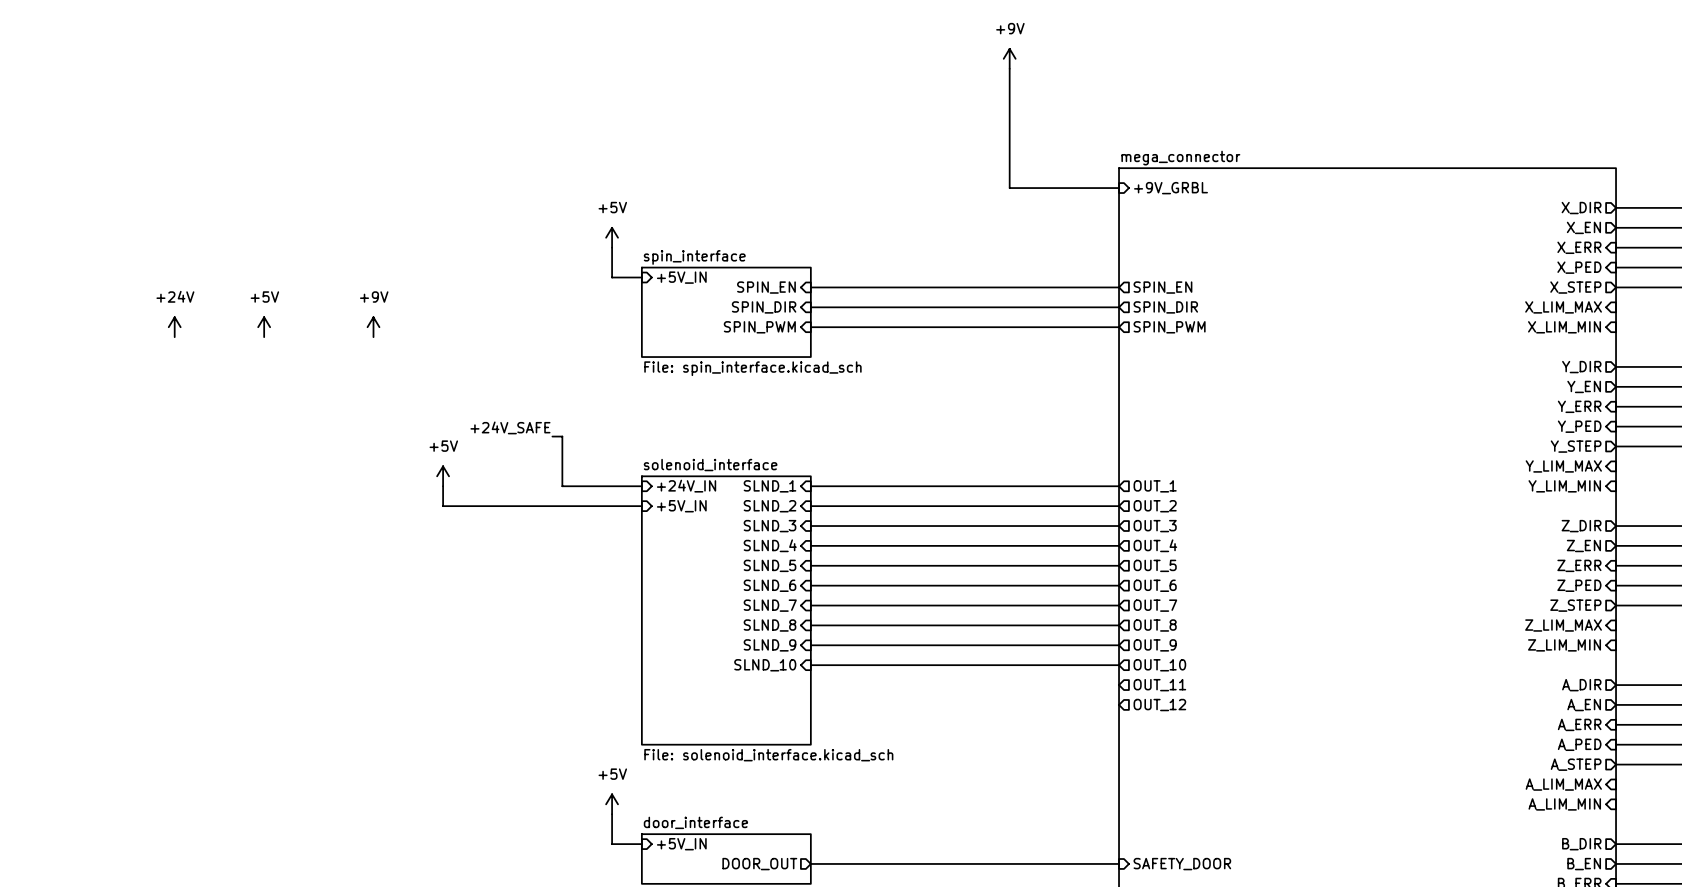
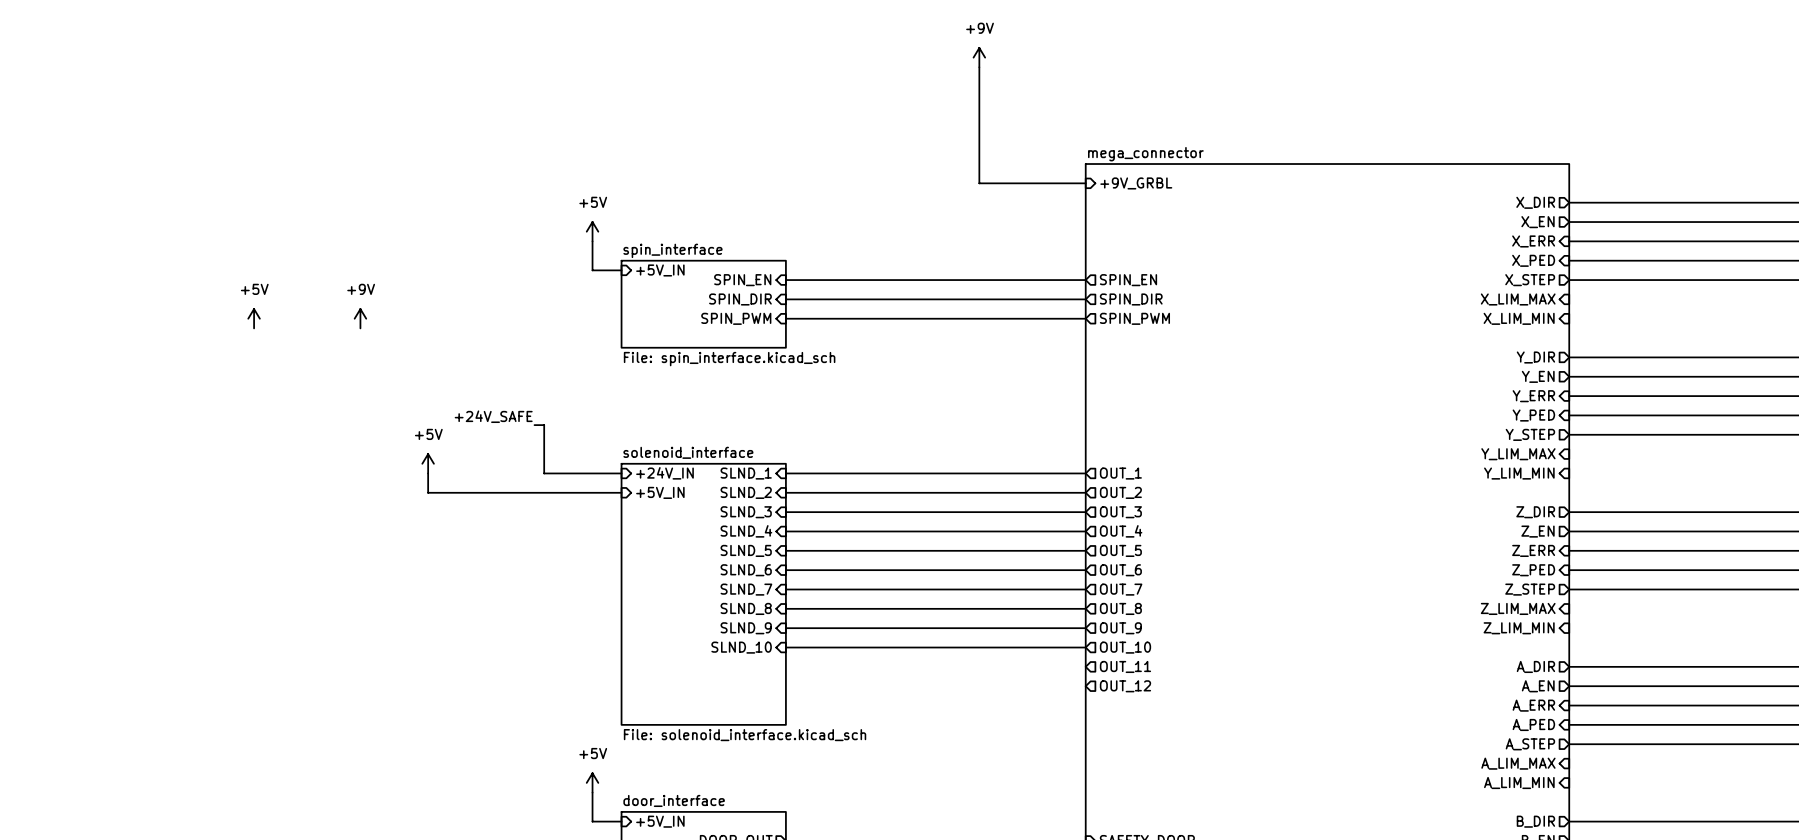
power symbol: +24V (174, 327) -> none

